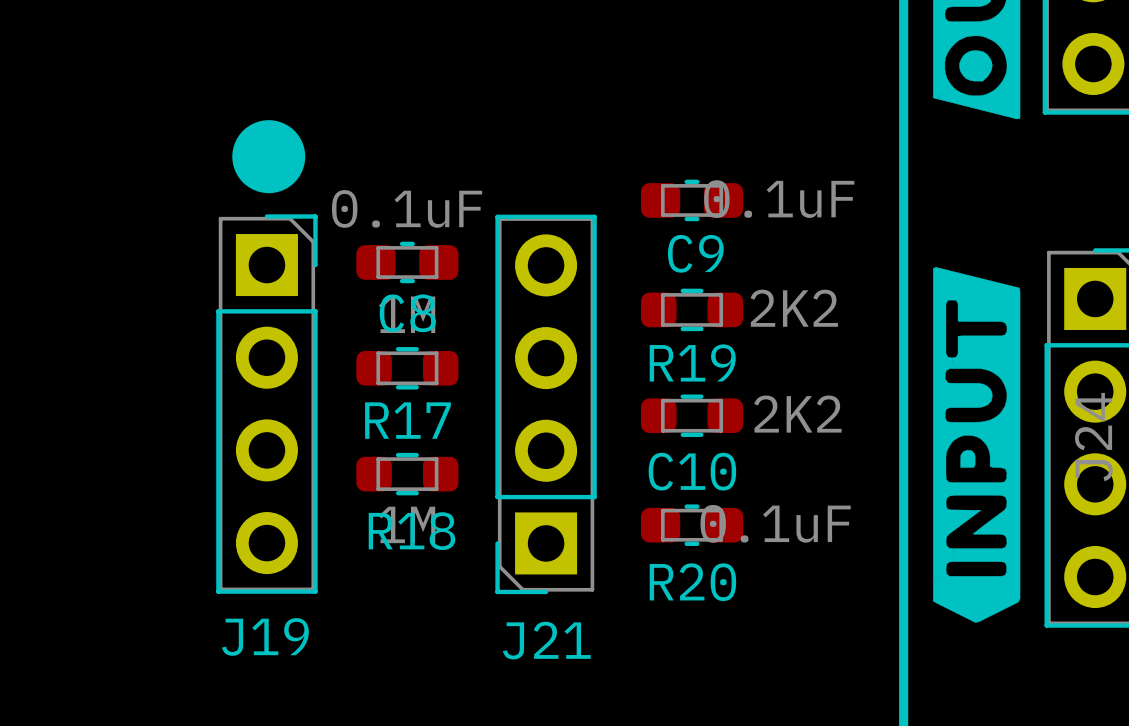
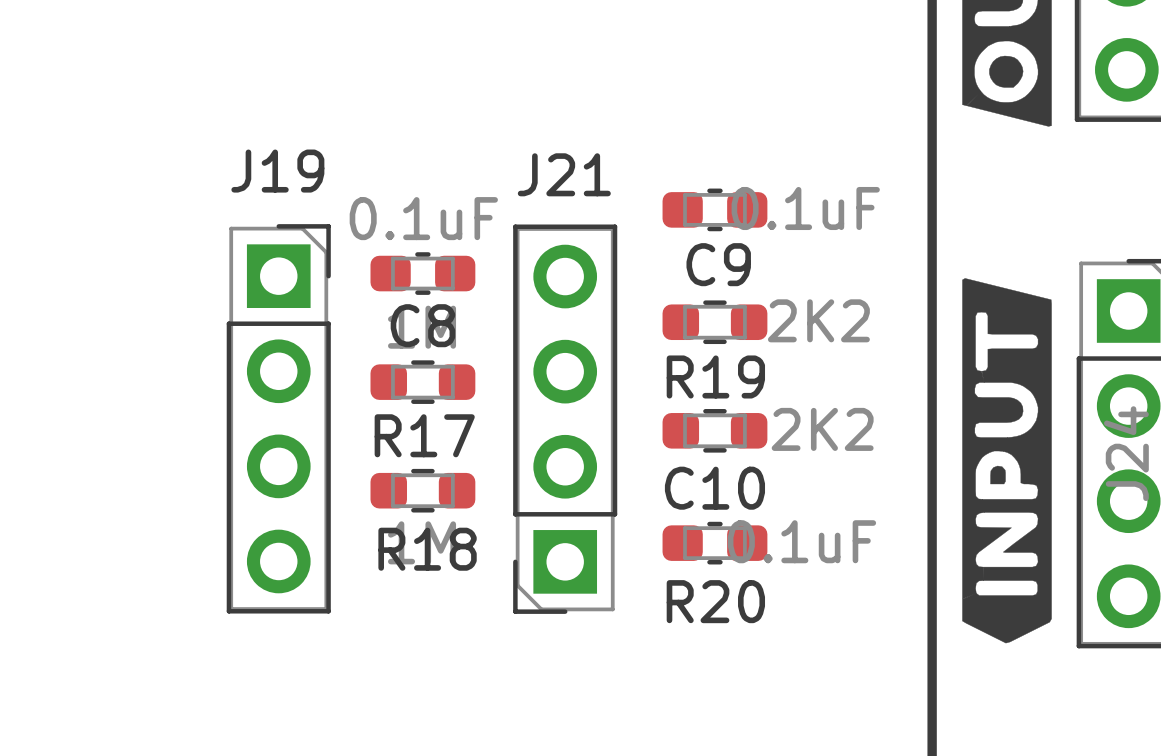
drawing: [232, 120, 306, 194] -> none
J19 name position: J19 (265, 636) -> J19 (277, 171)
J21 name position: J21 (546, 640) -> J21 (564, 174)

